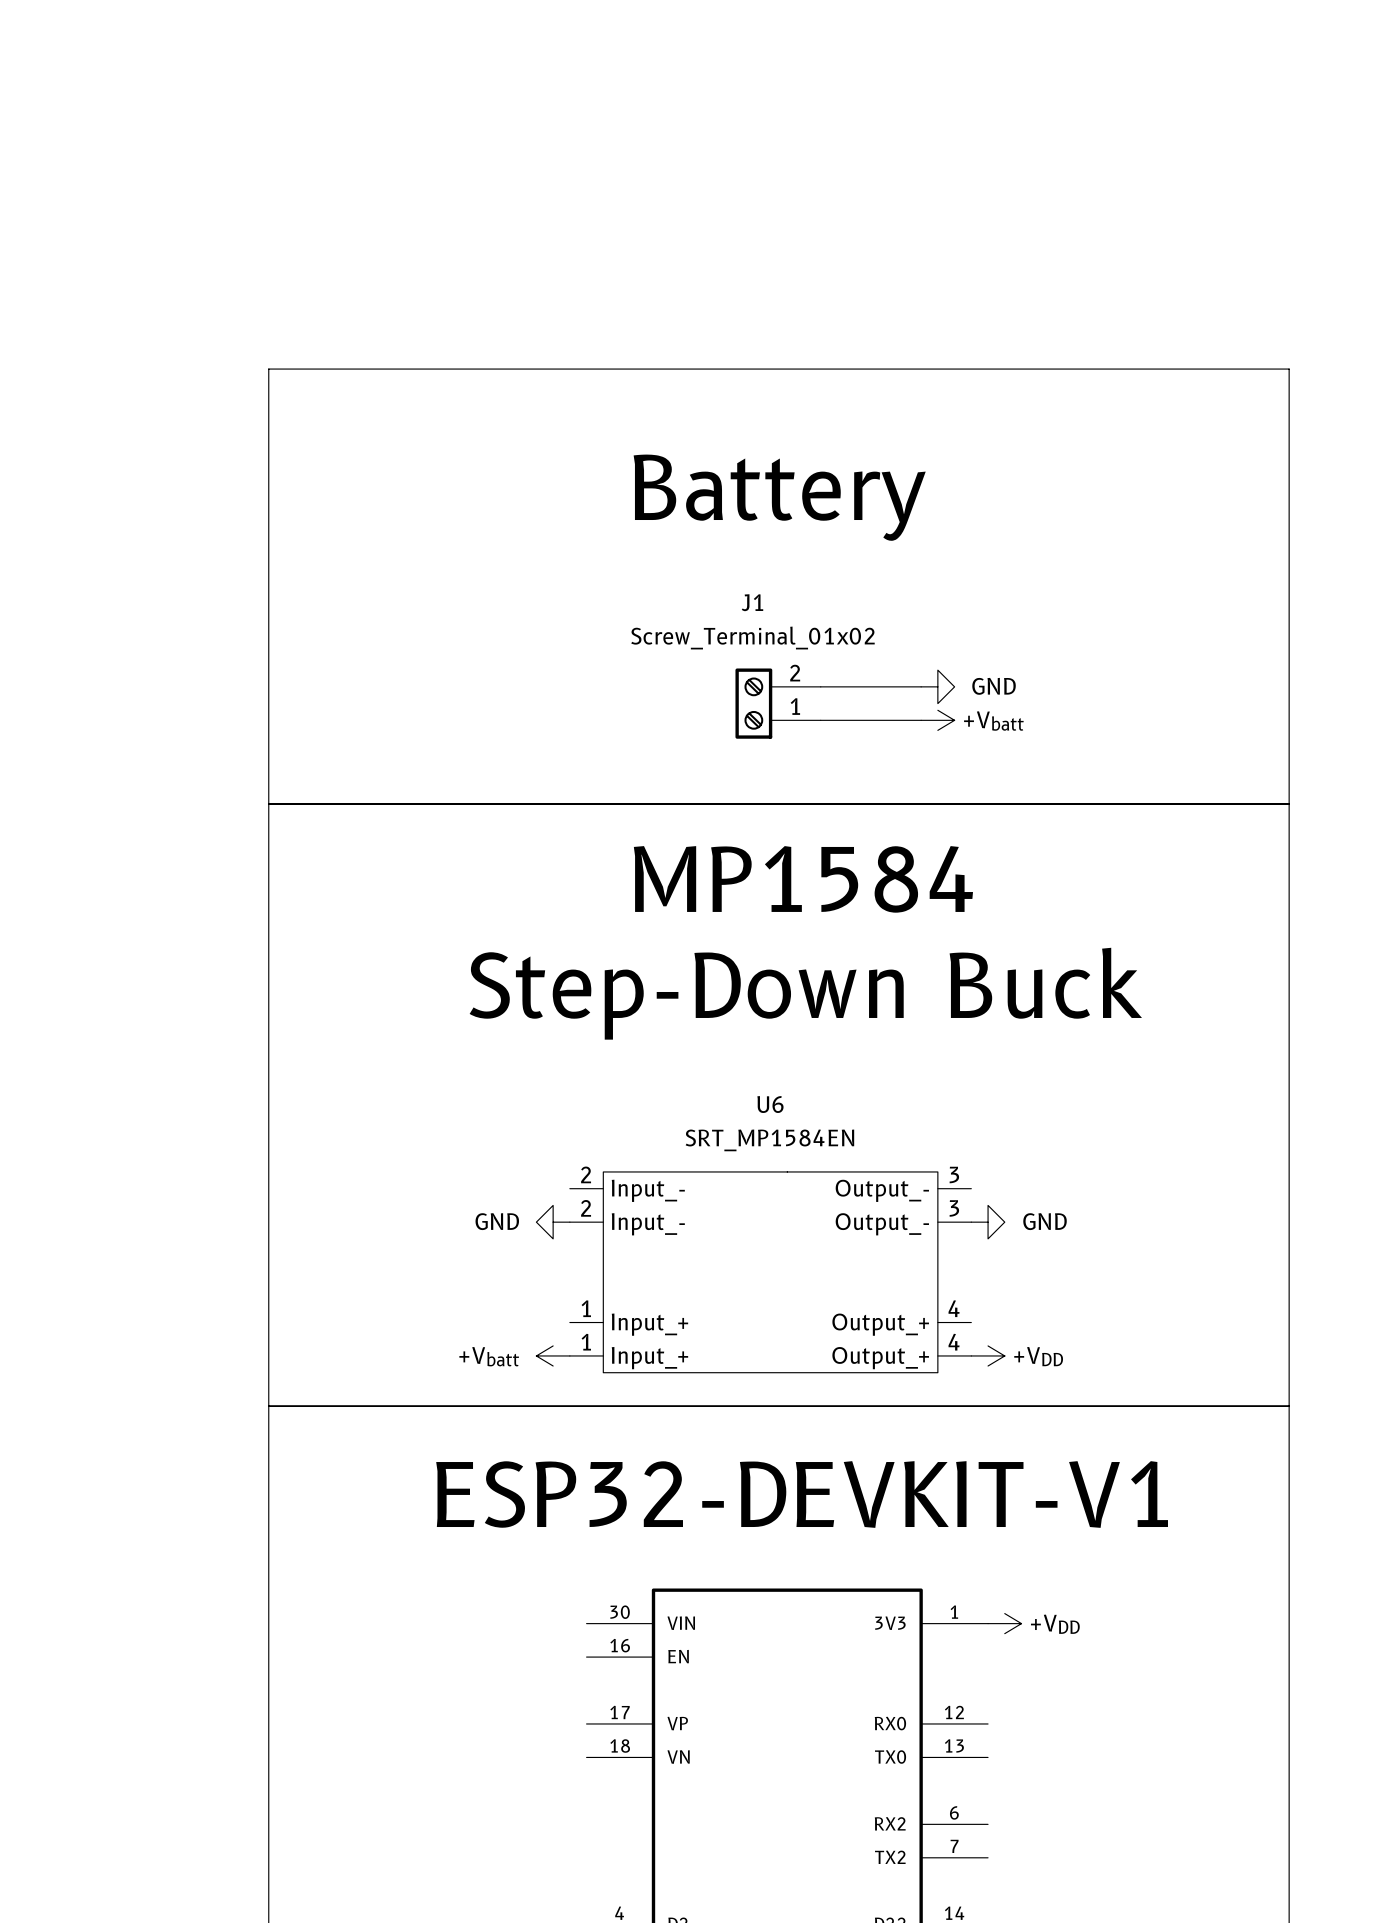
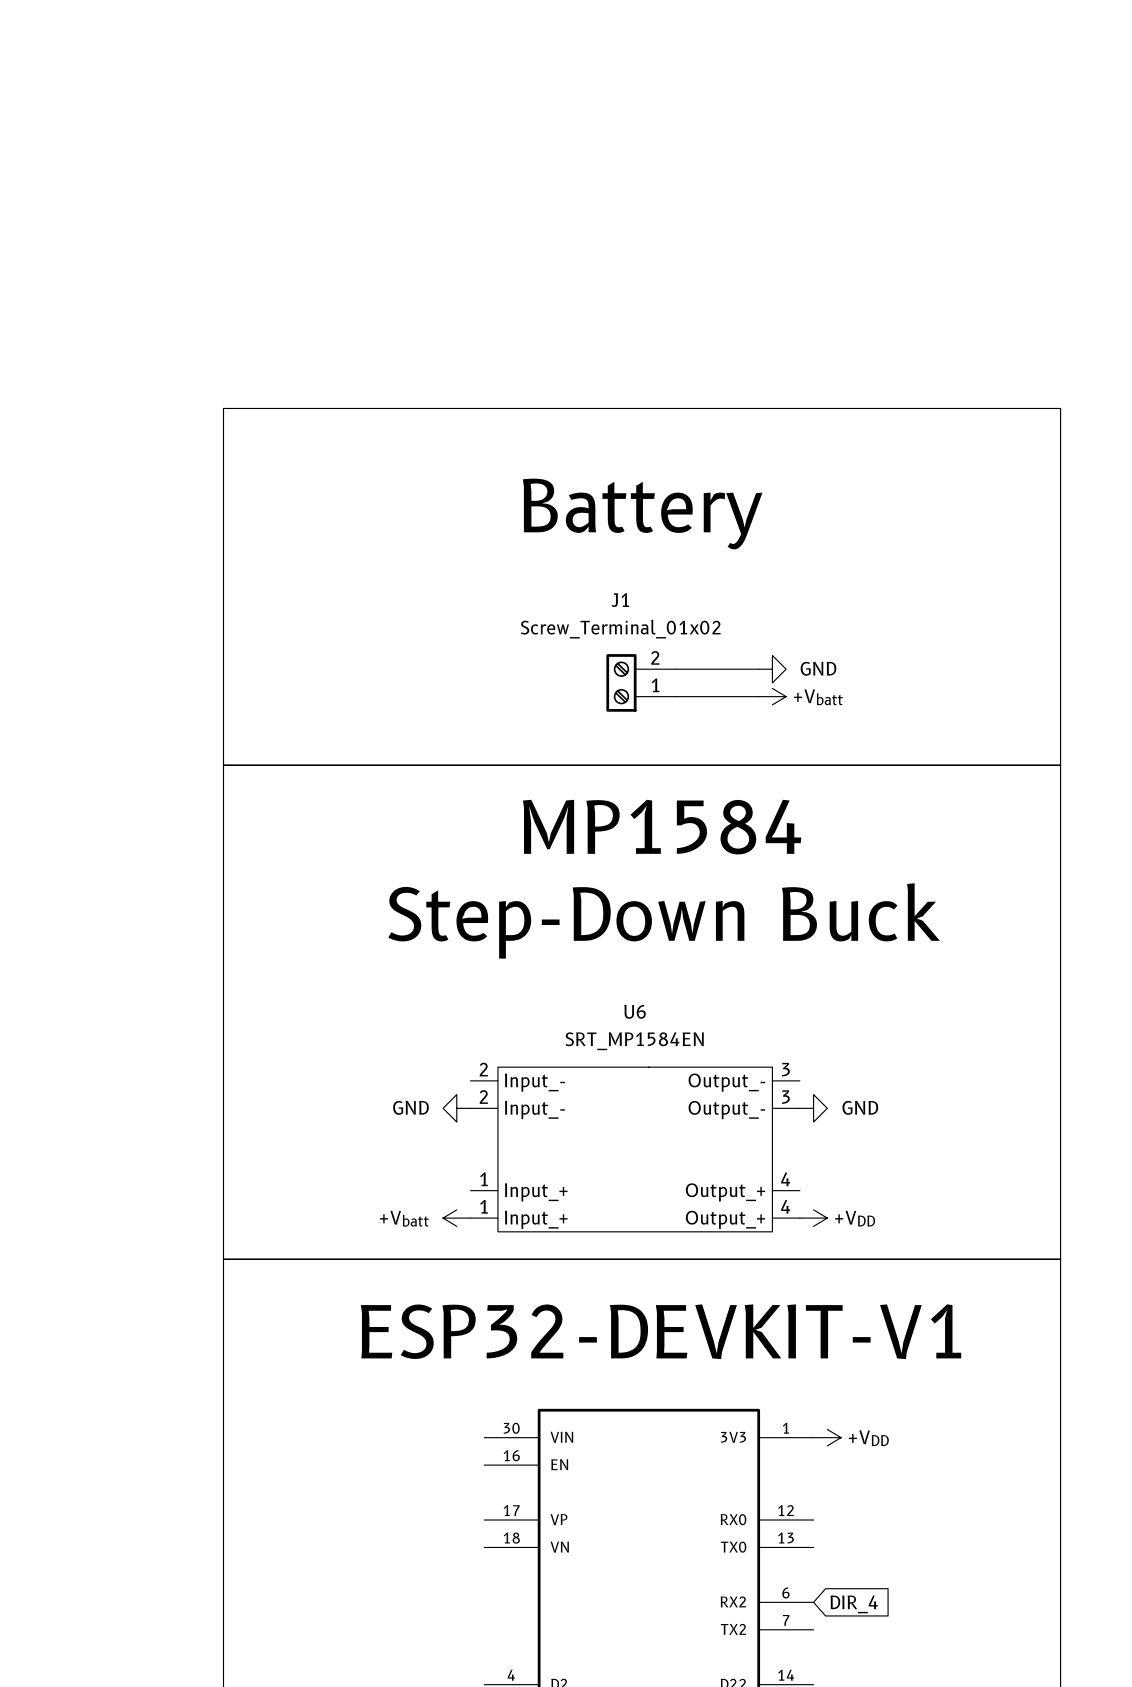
global label: none -> DIR_4 (854, 1604)

